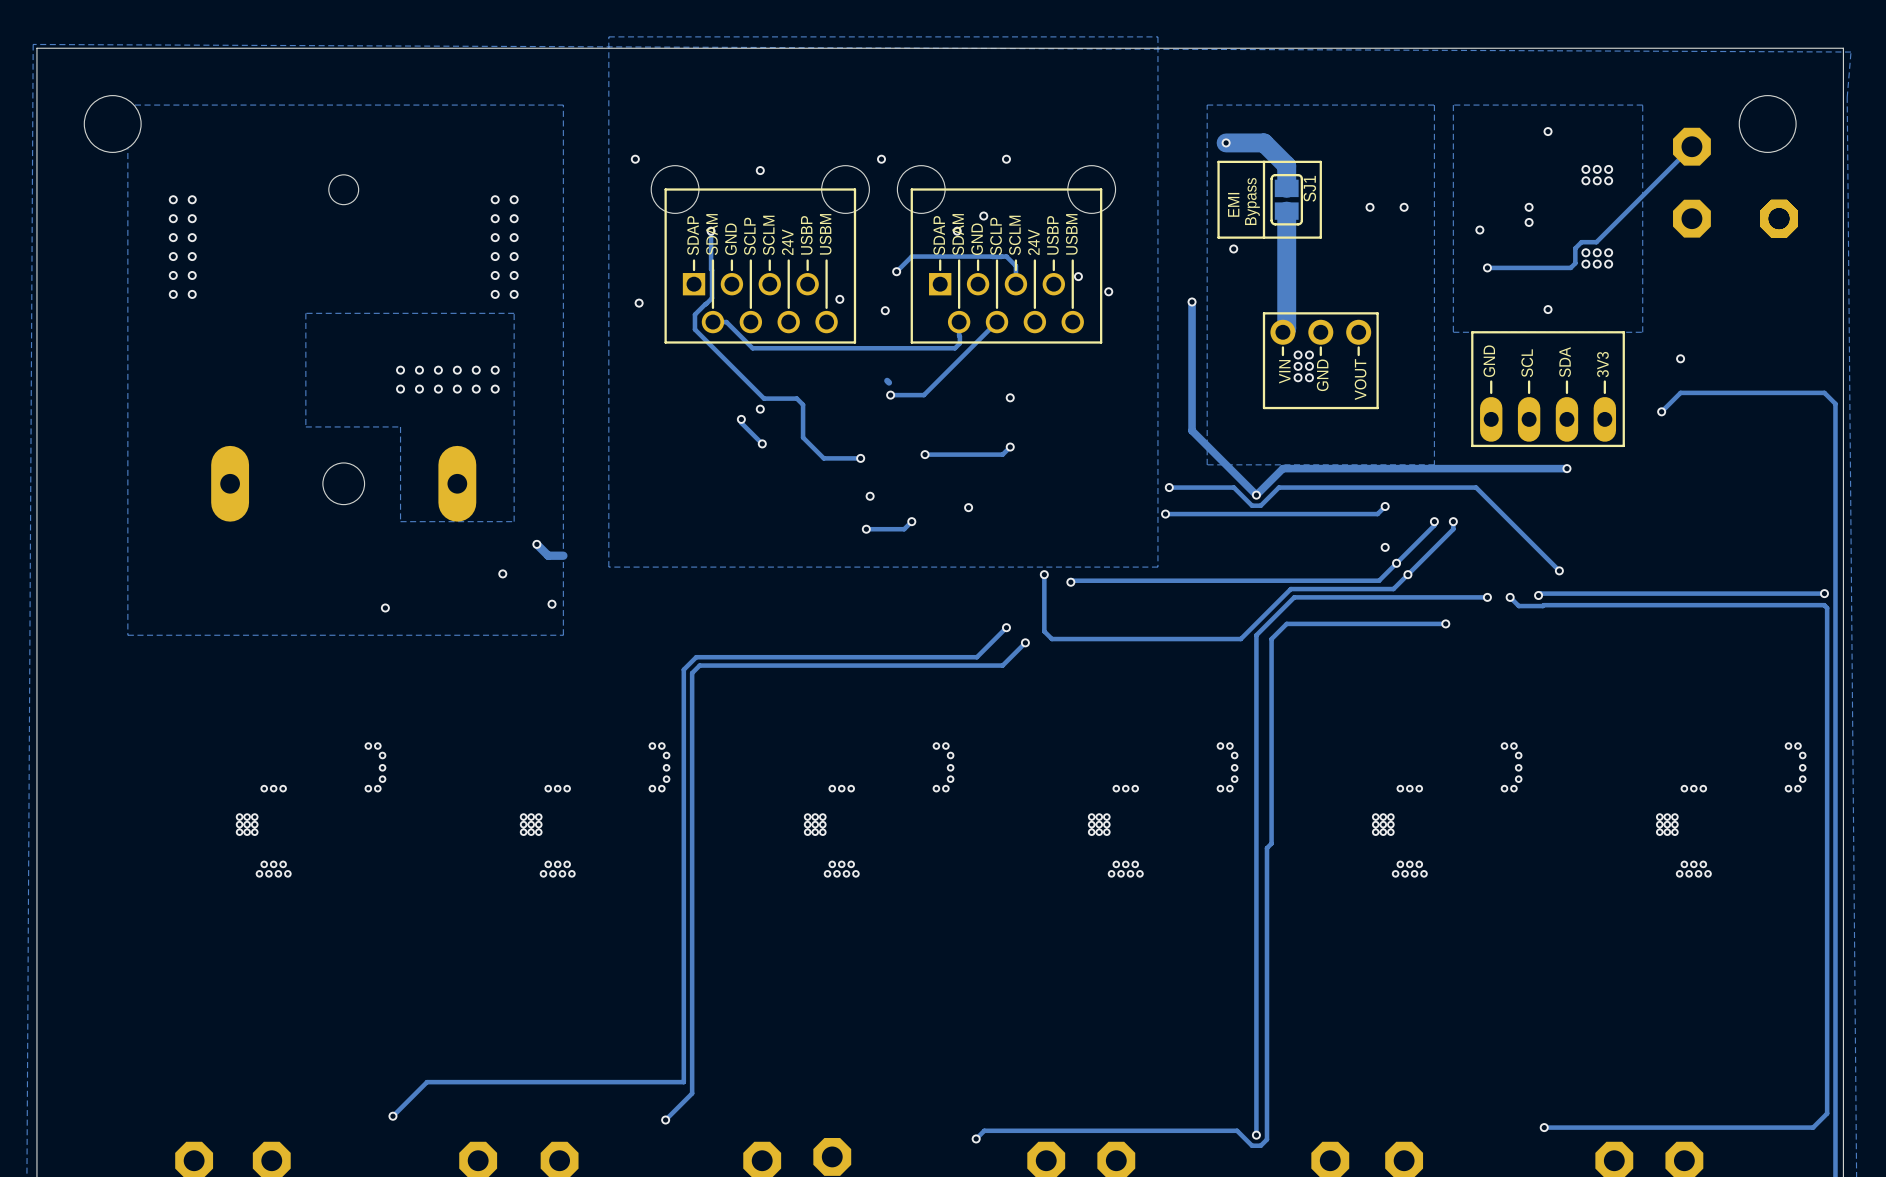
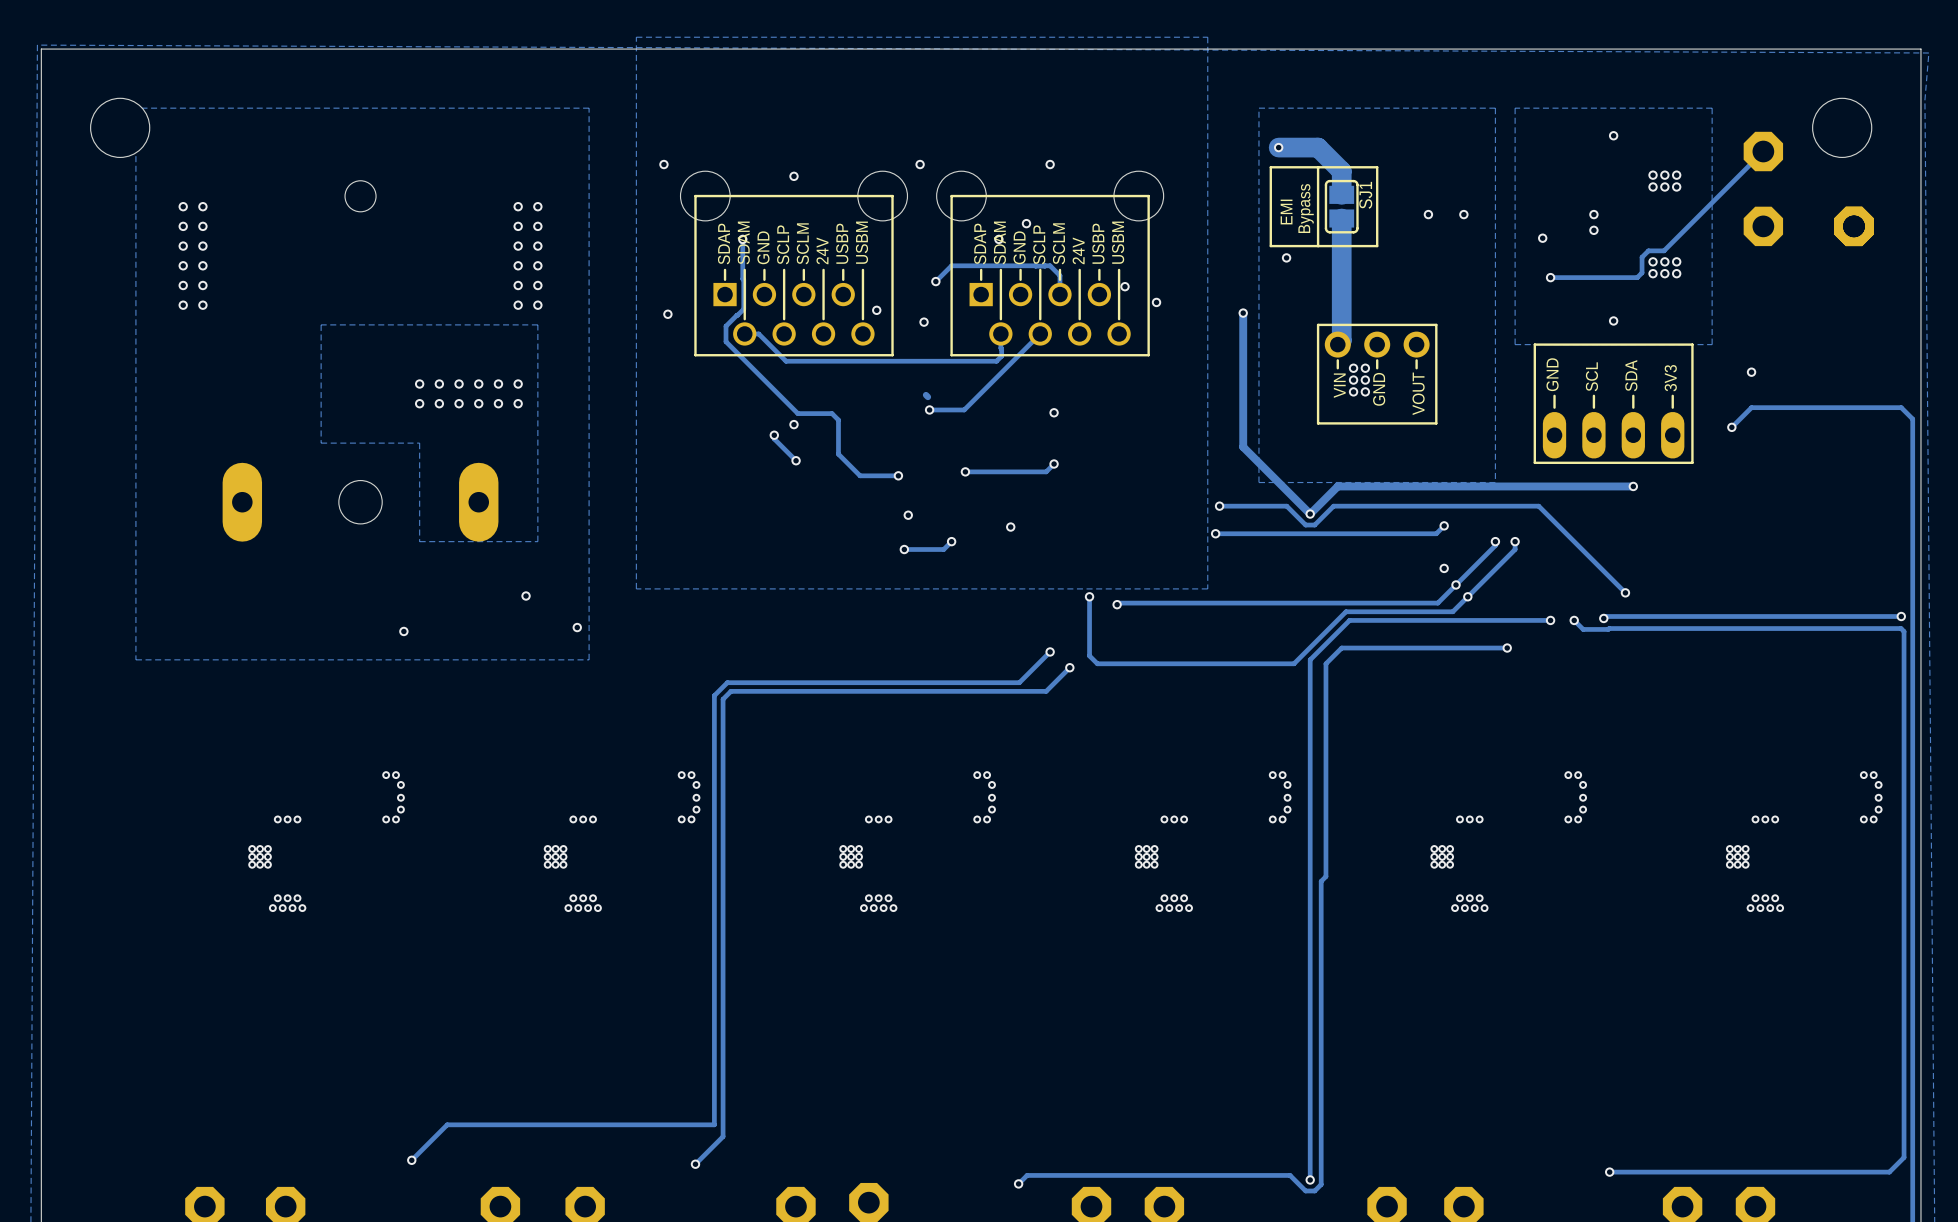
track: (536, 544) (548, 555) (563, 555) -> none
via: (536, 544) -> none

